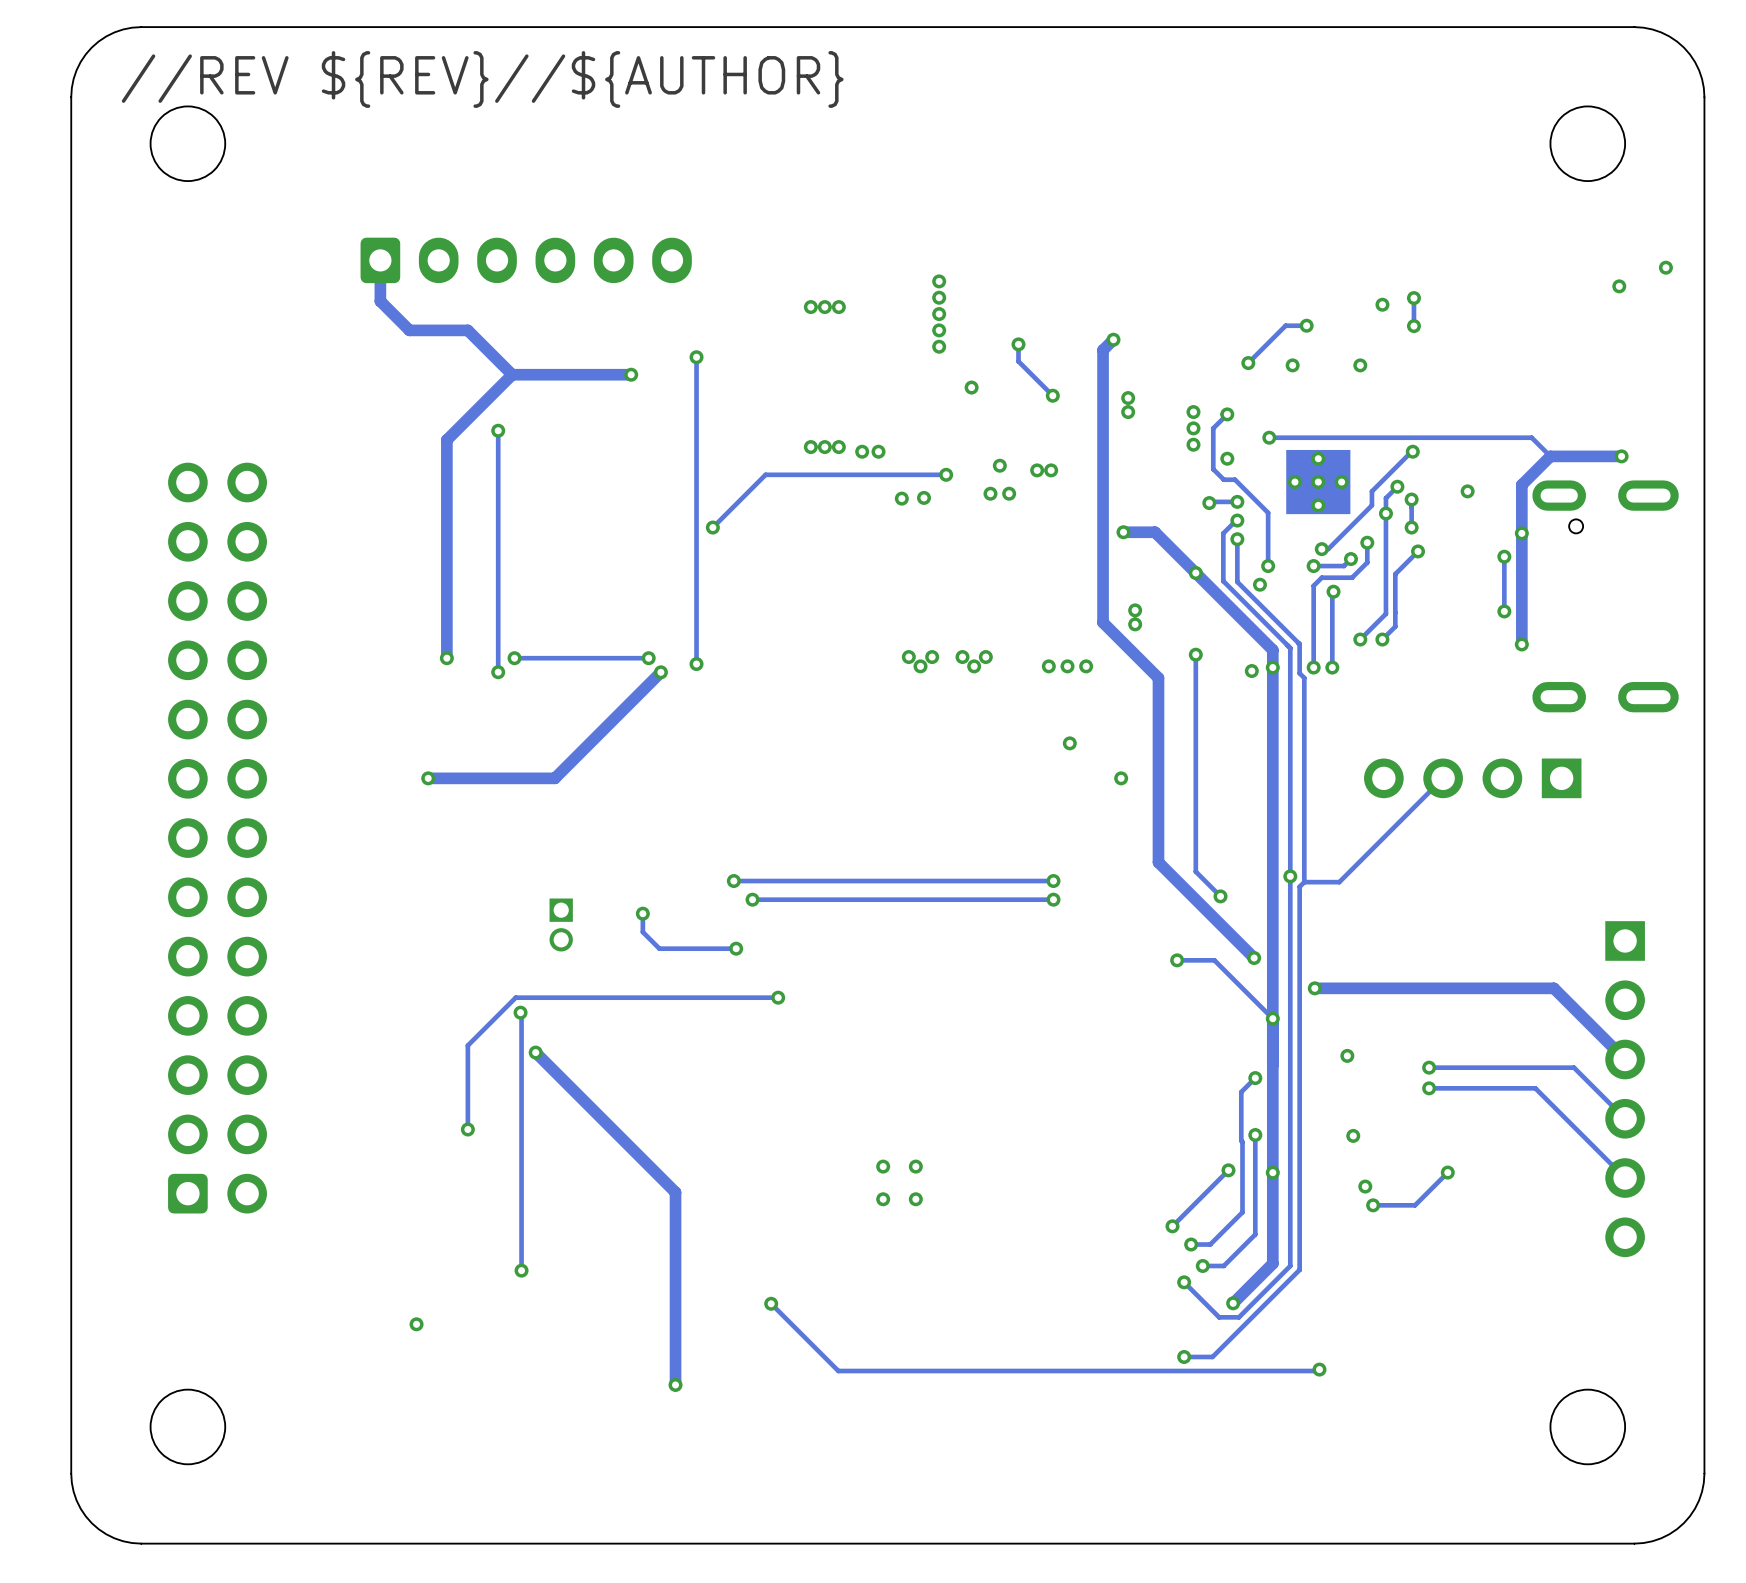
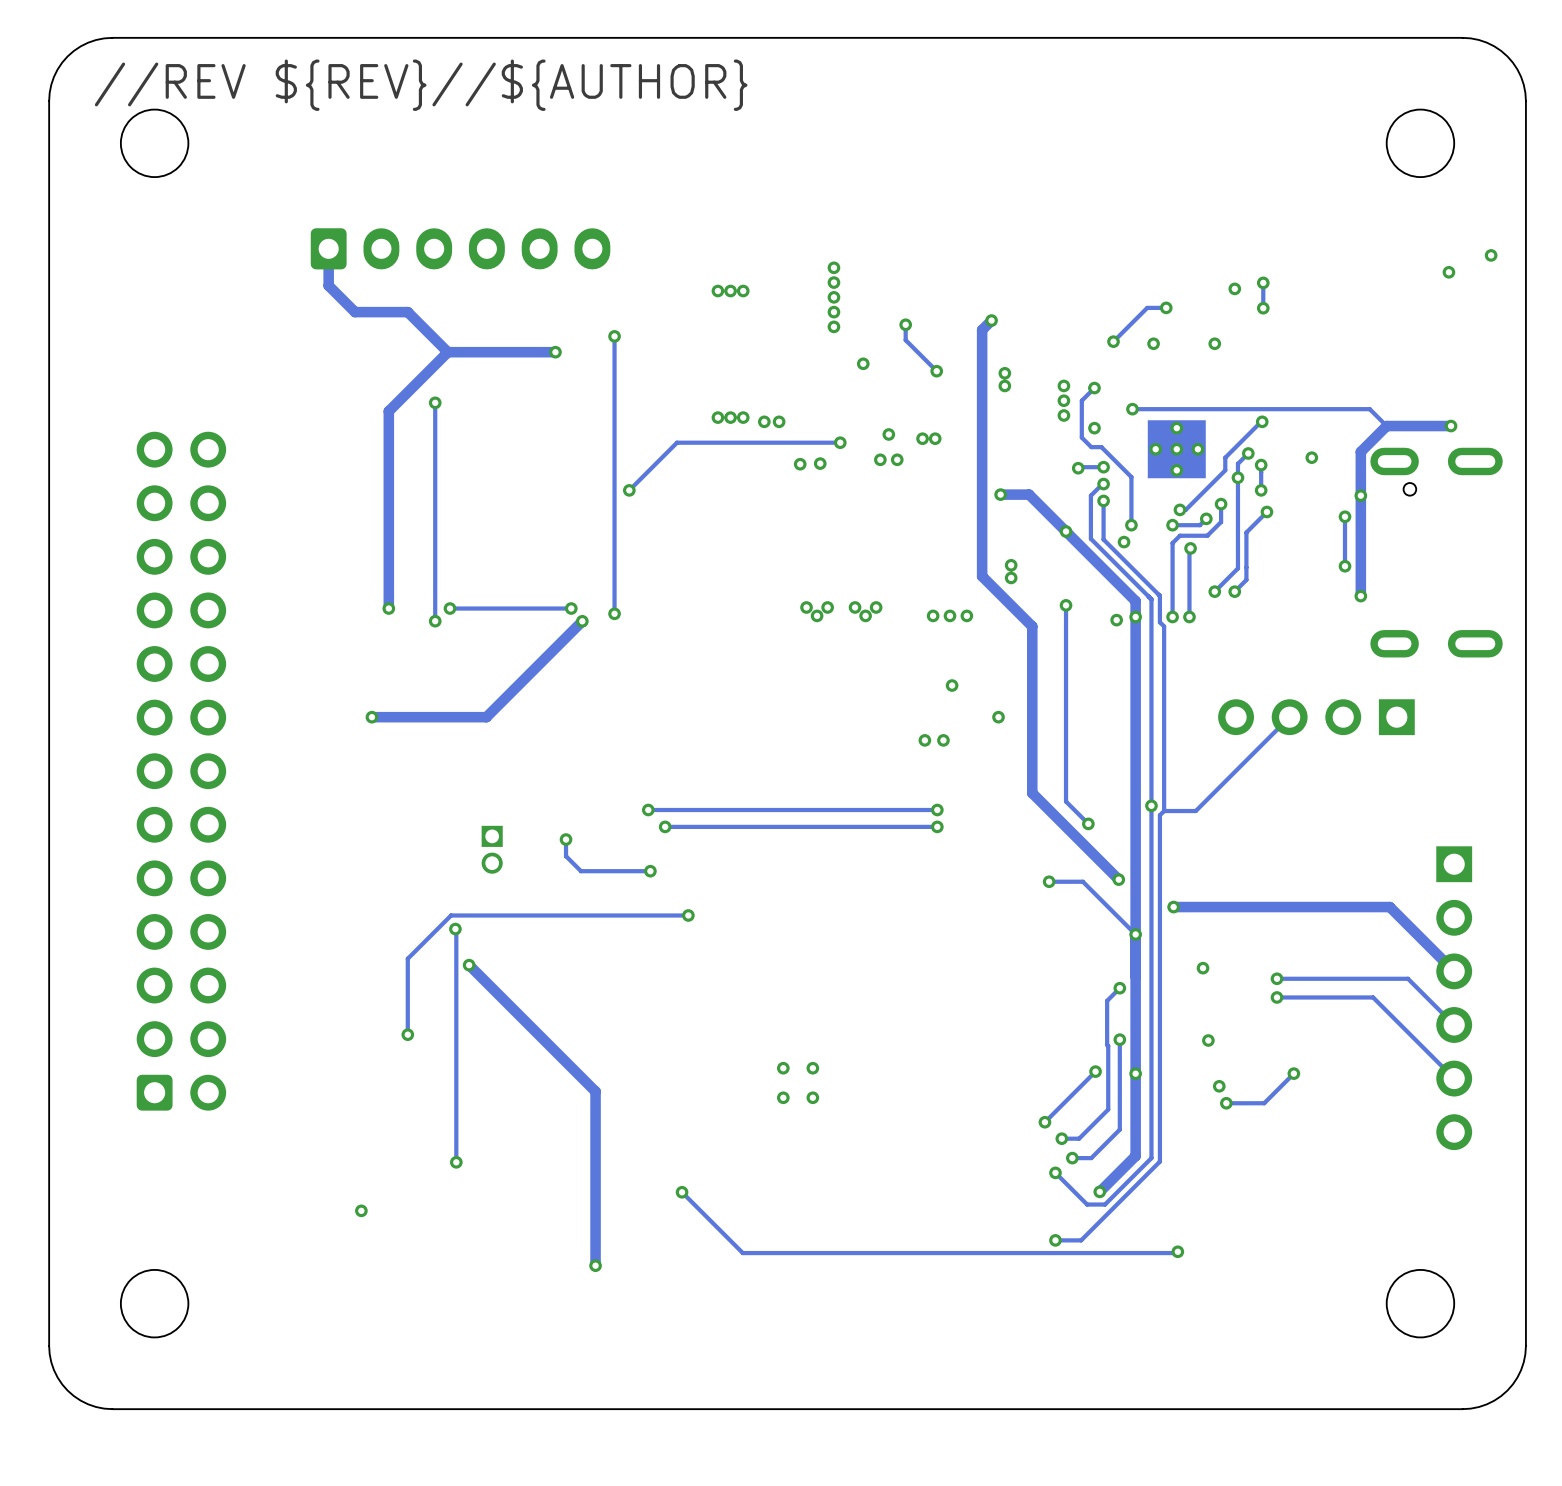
via: none -> (924, 740)
via: none -> (943, 740)

